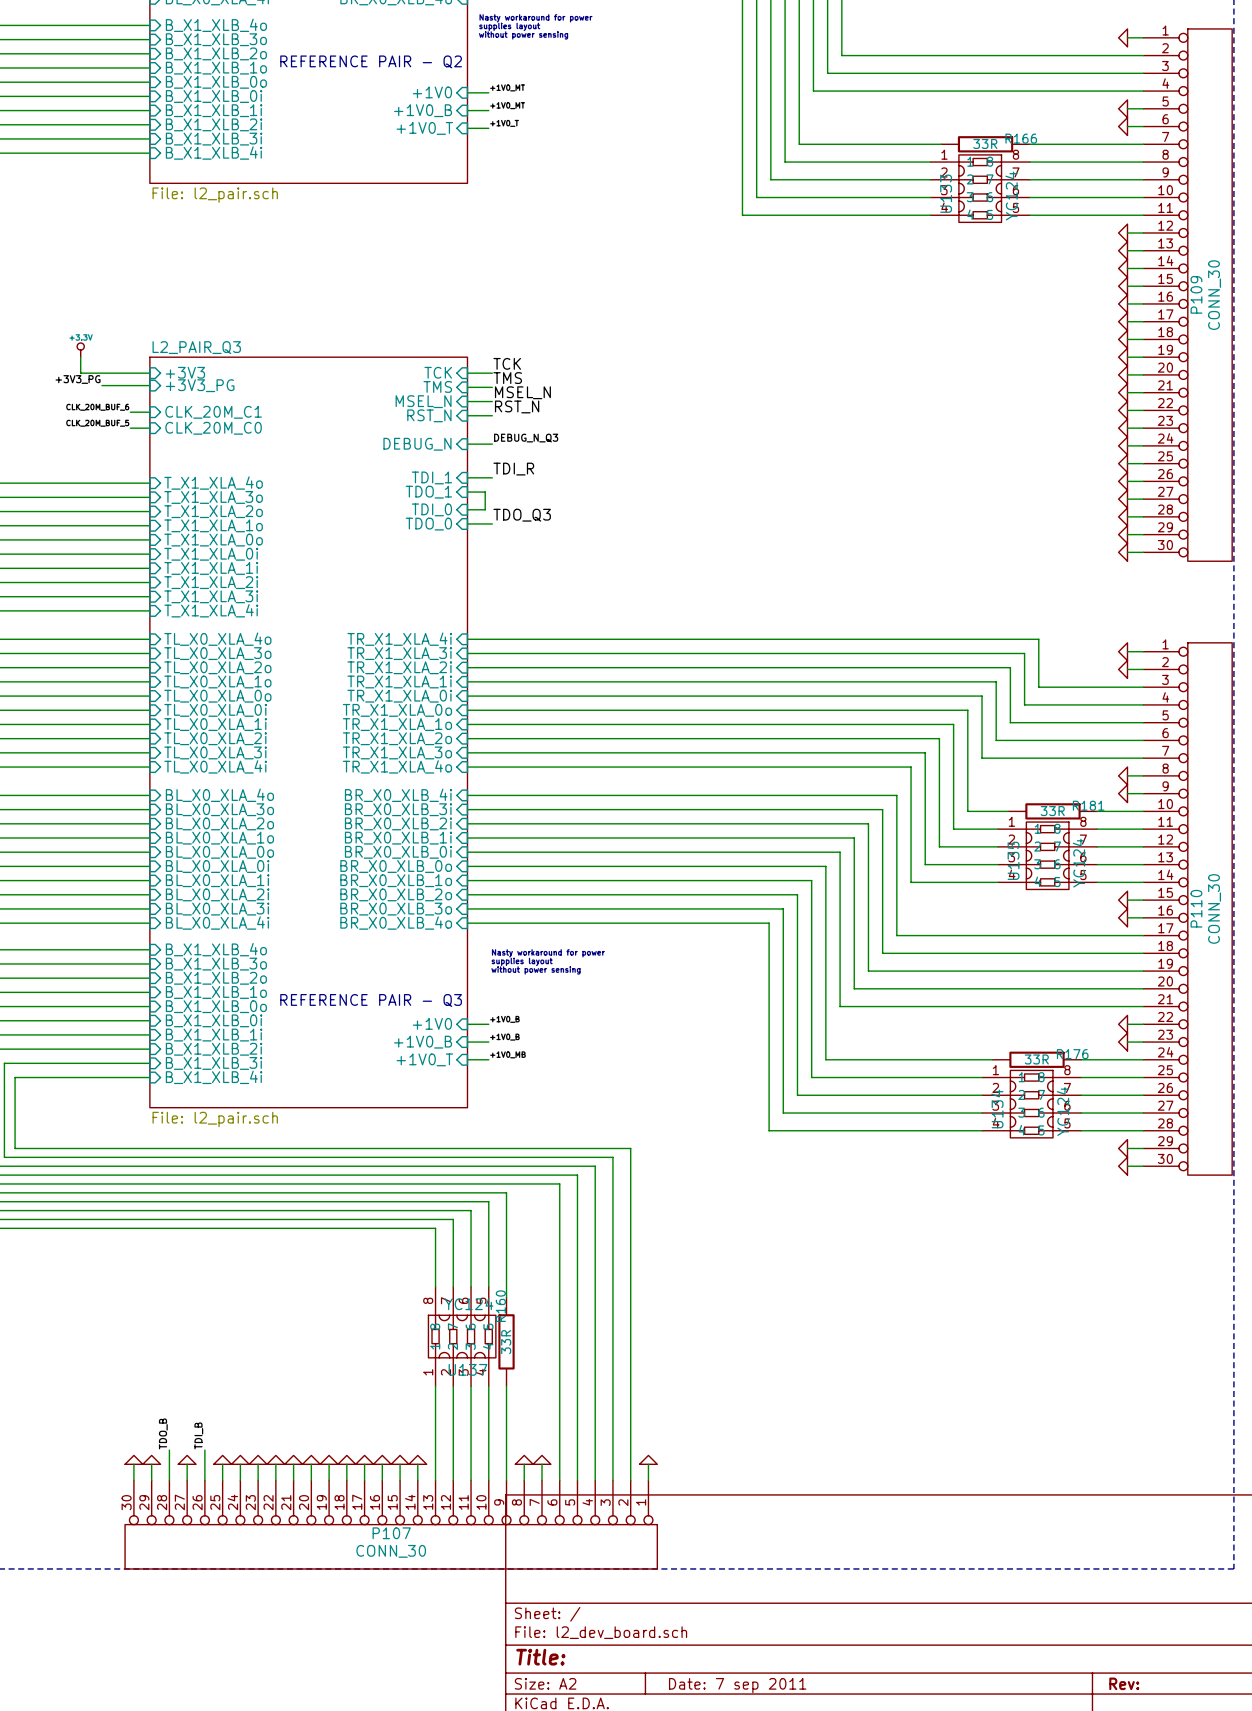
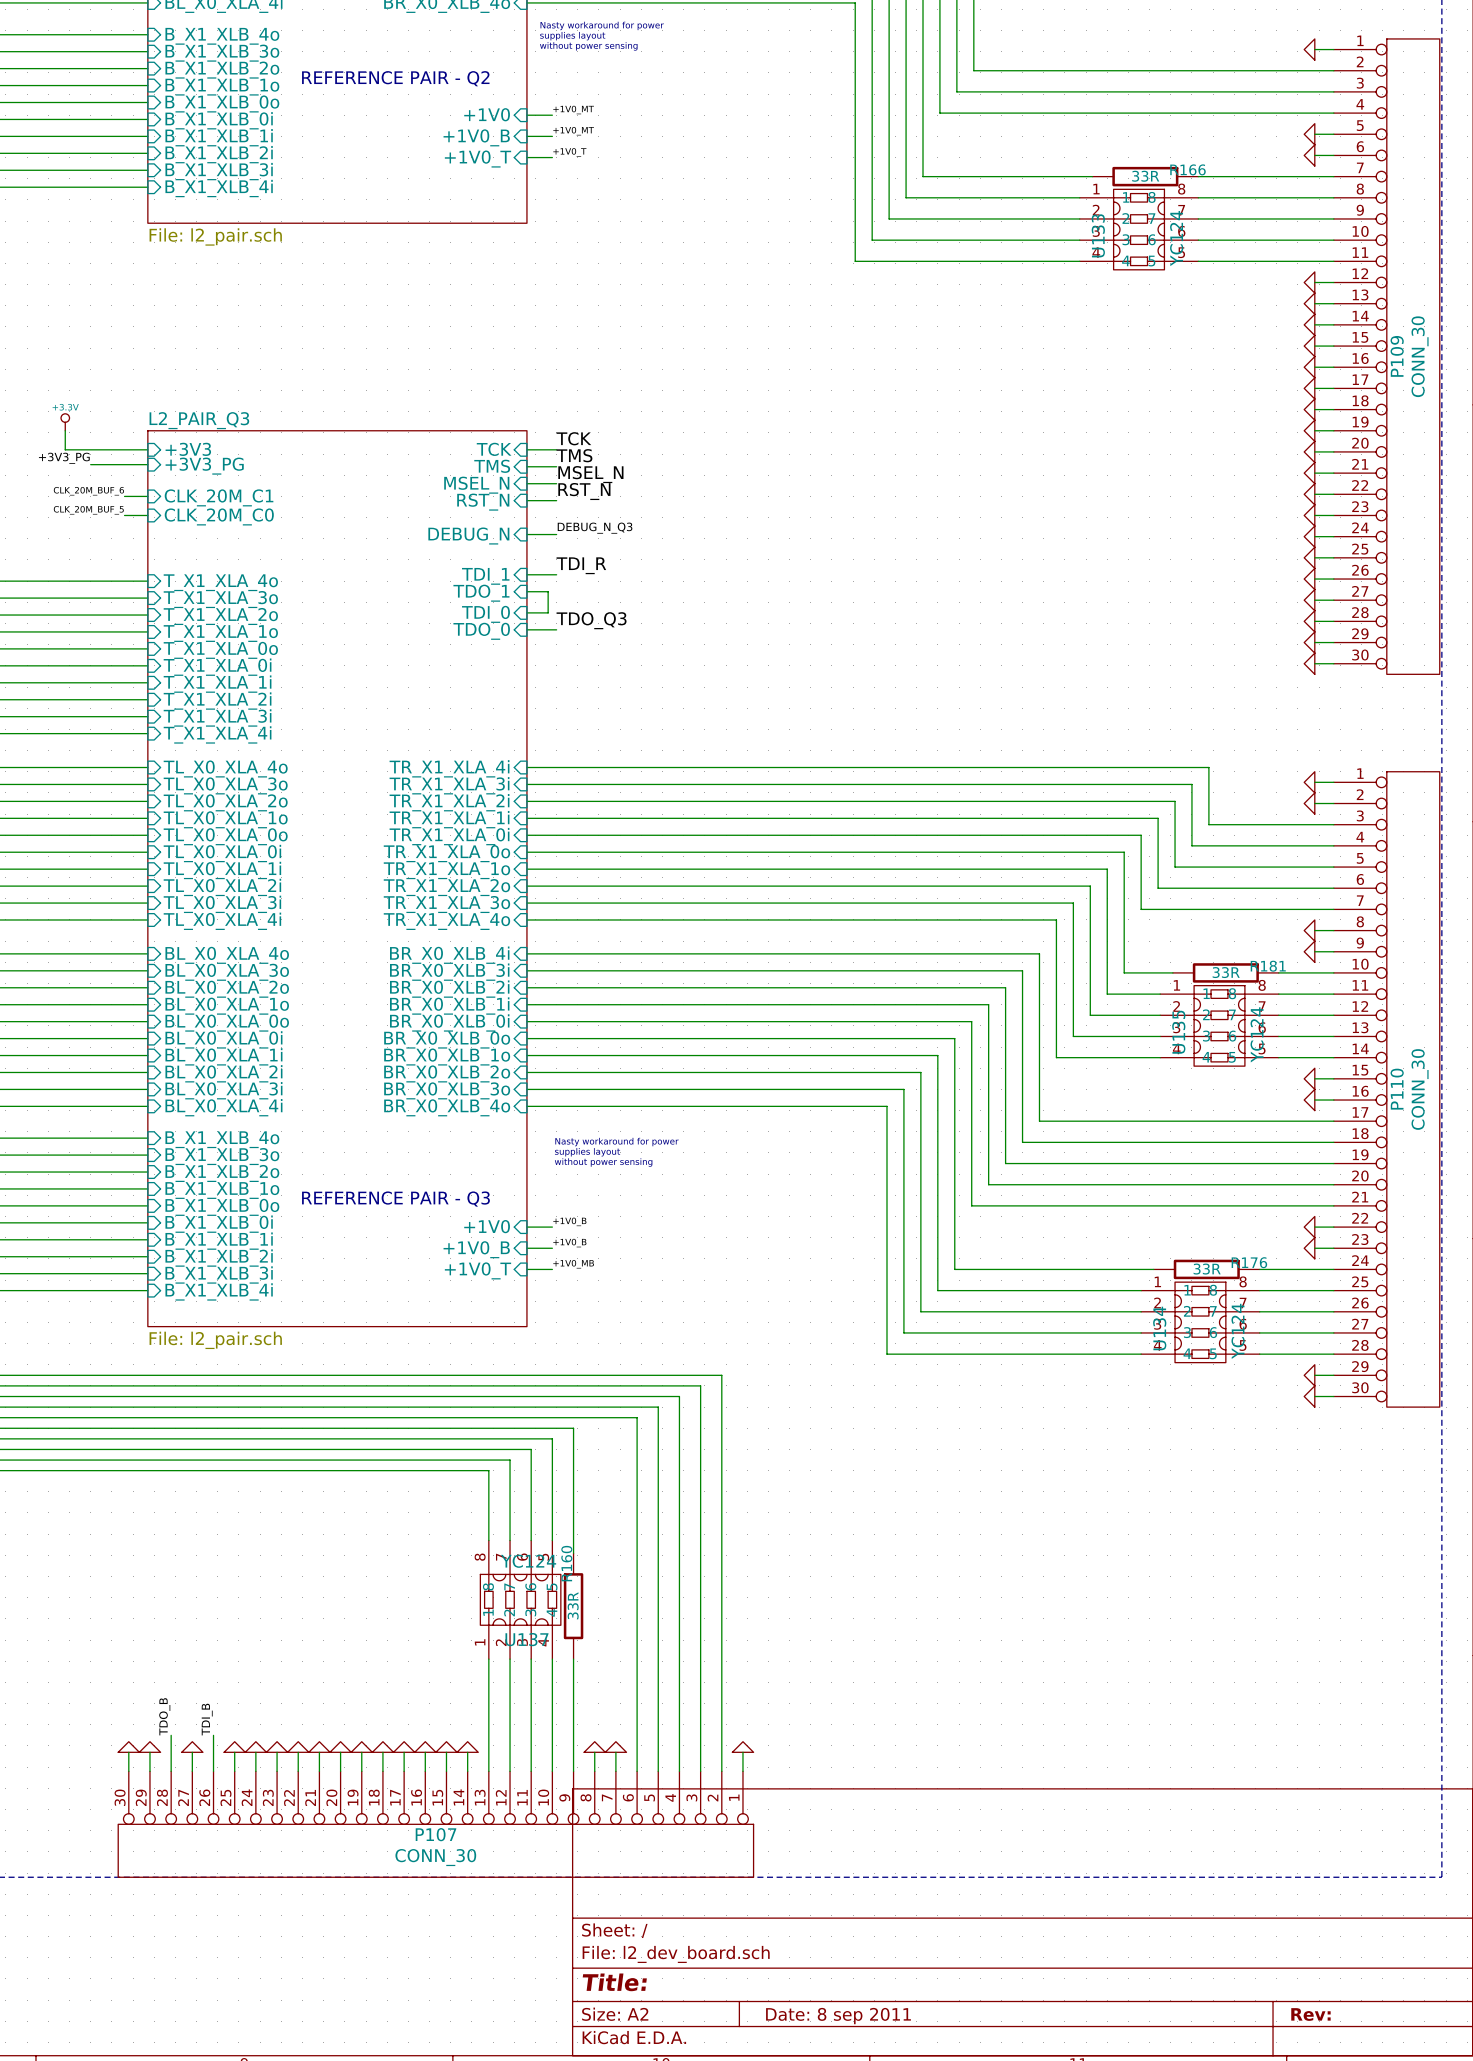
title block: Date: 7 sep 2011 (737, 1685) -> Date: 8 sep 2011 (838, 2016)

